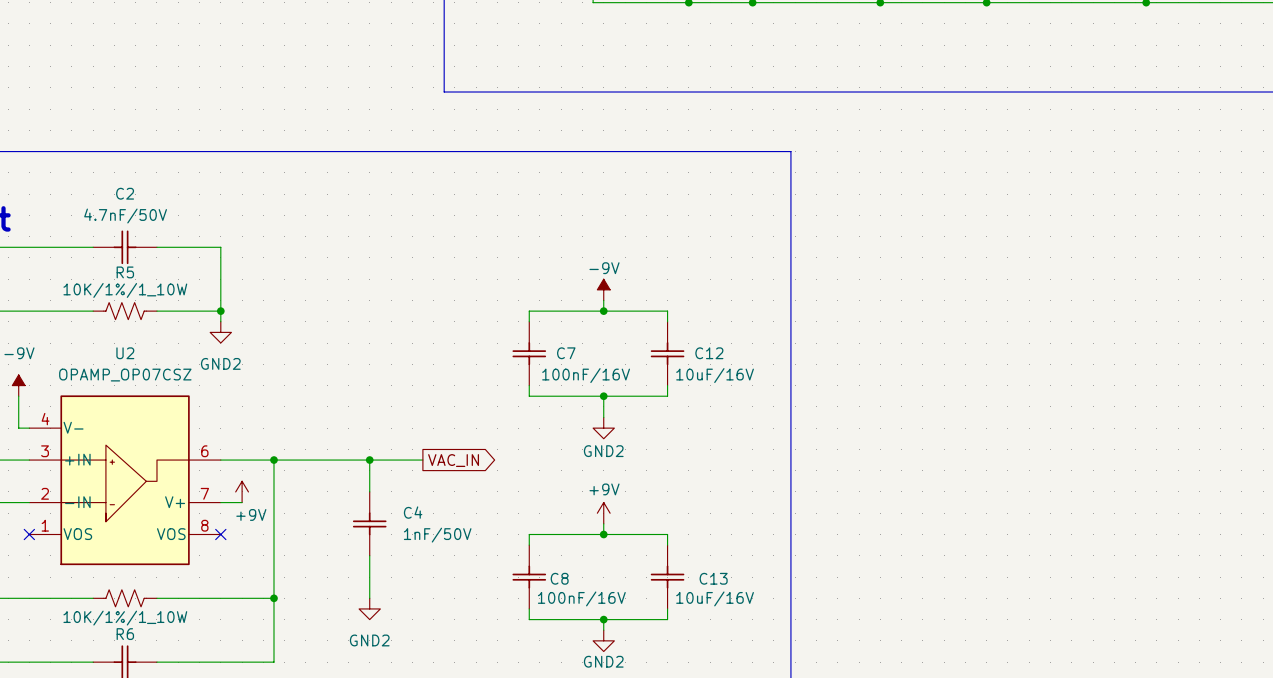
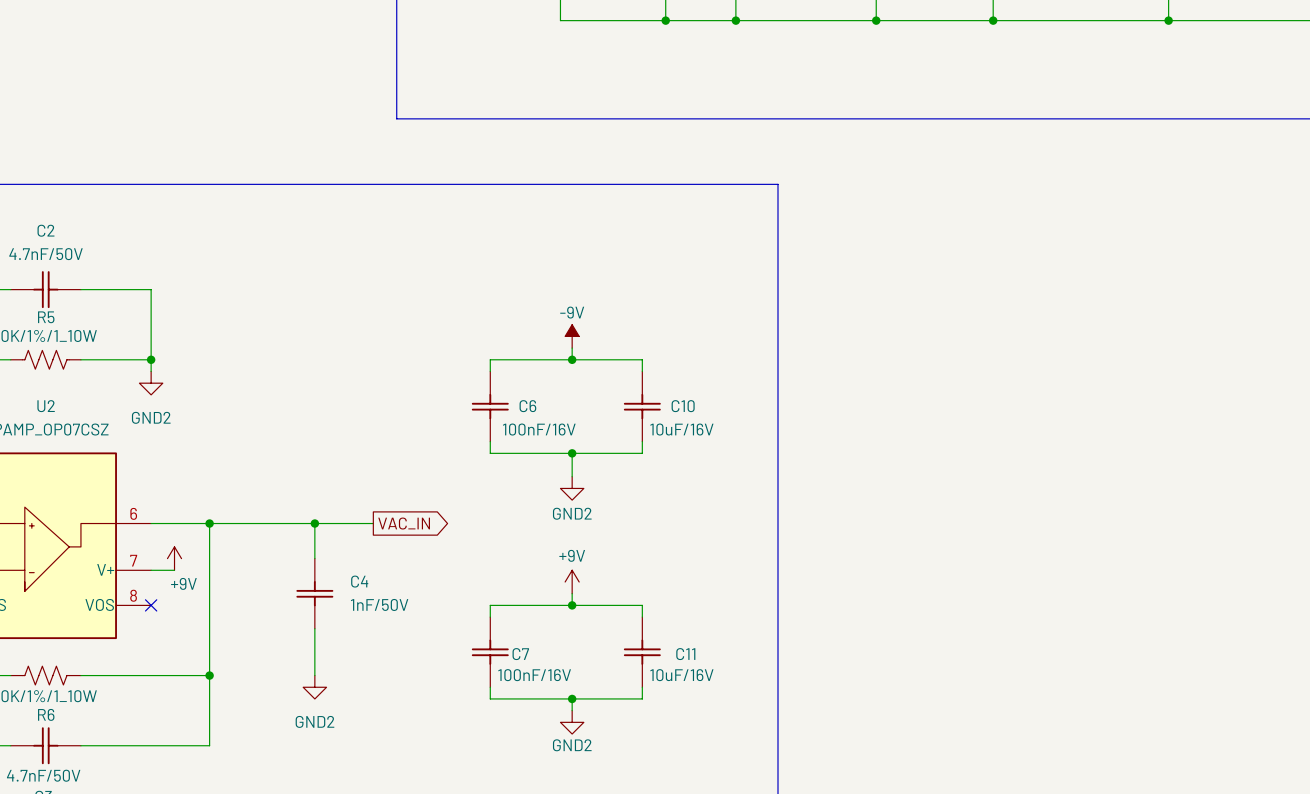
C7 name: C7 (566, 353) -> C6 (527, 406)
C12 name: C12 (709, 353) -> C10 (683, 406)
C8 name: C8 (559, 578) -> C7 (520, 654)
C13 name: C13 (713, 578) -> C11 (685, 654)

